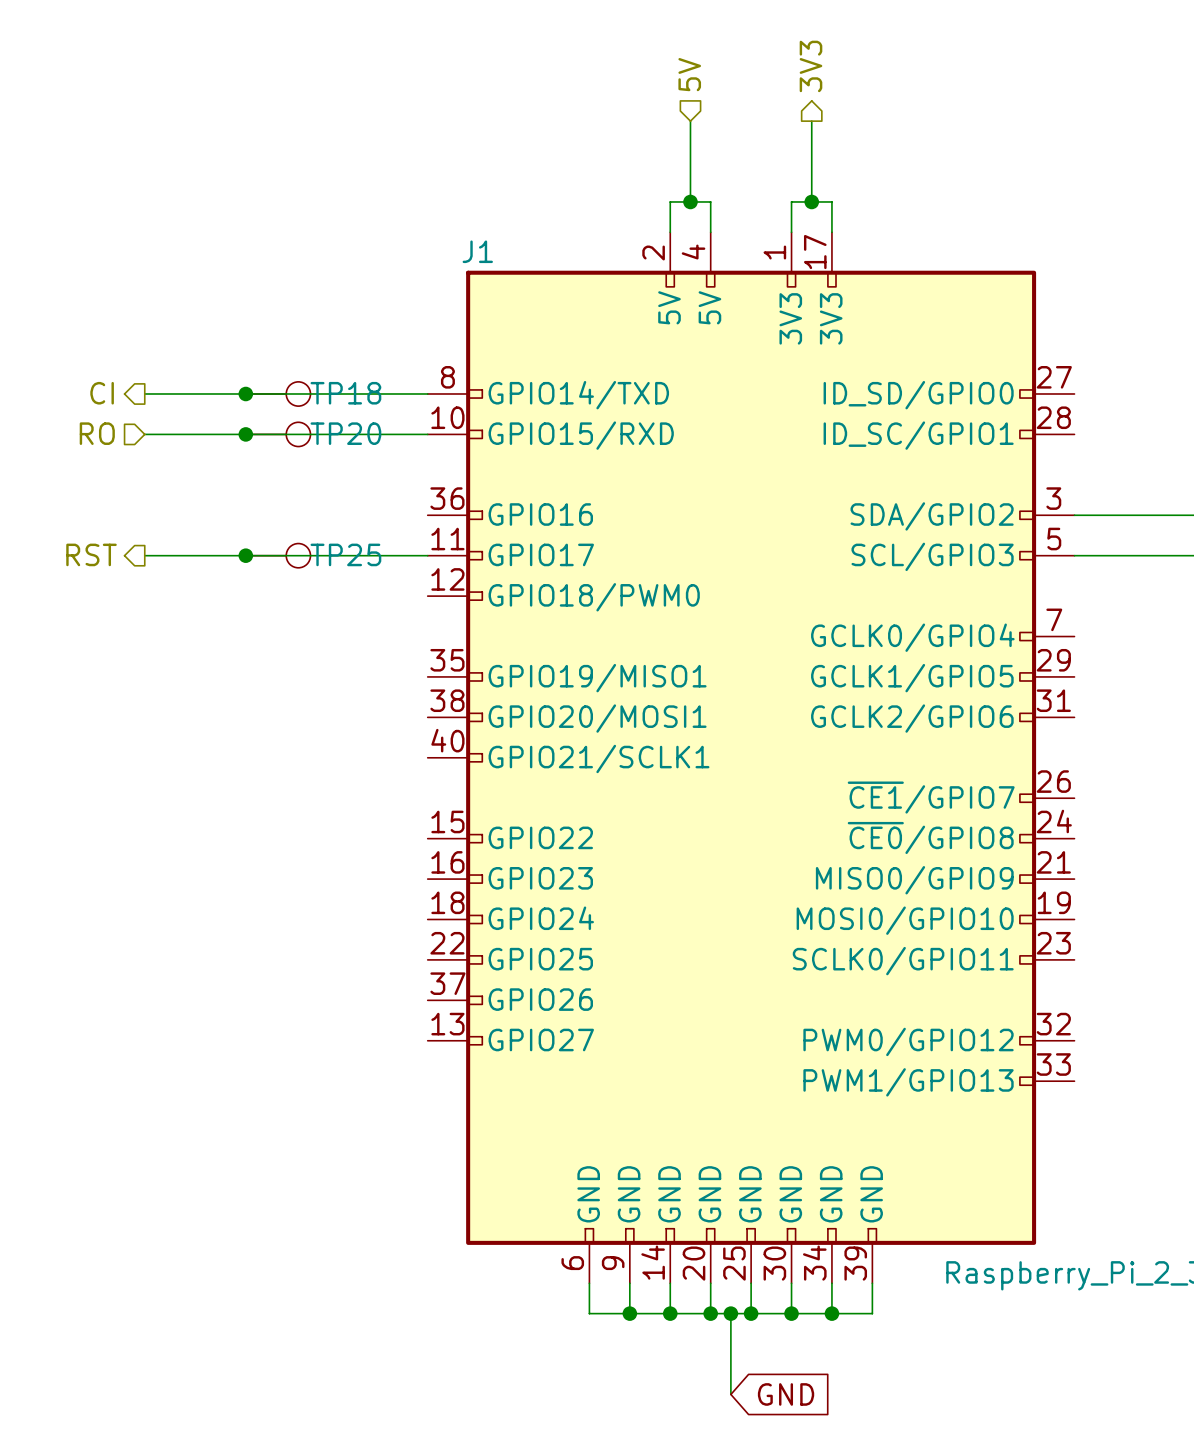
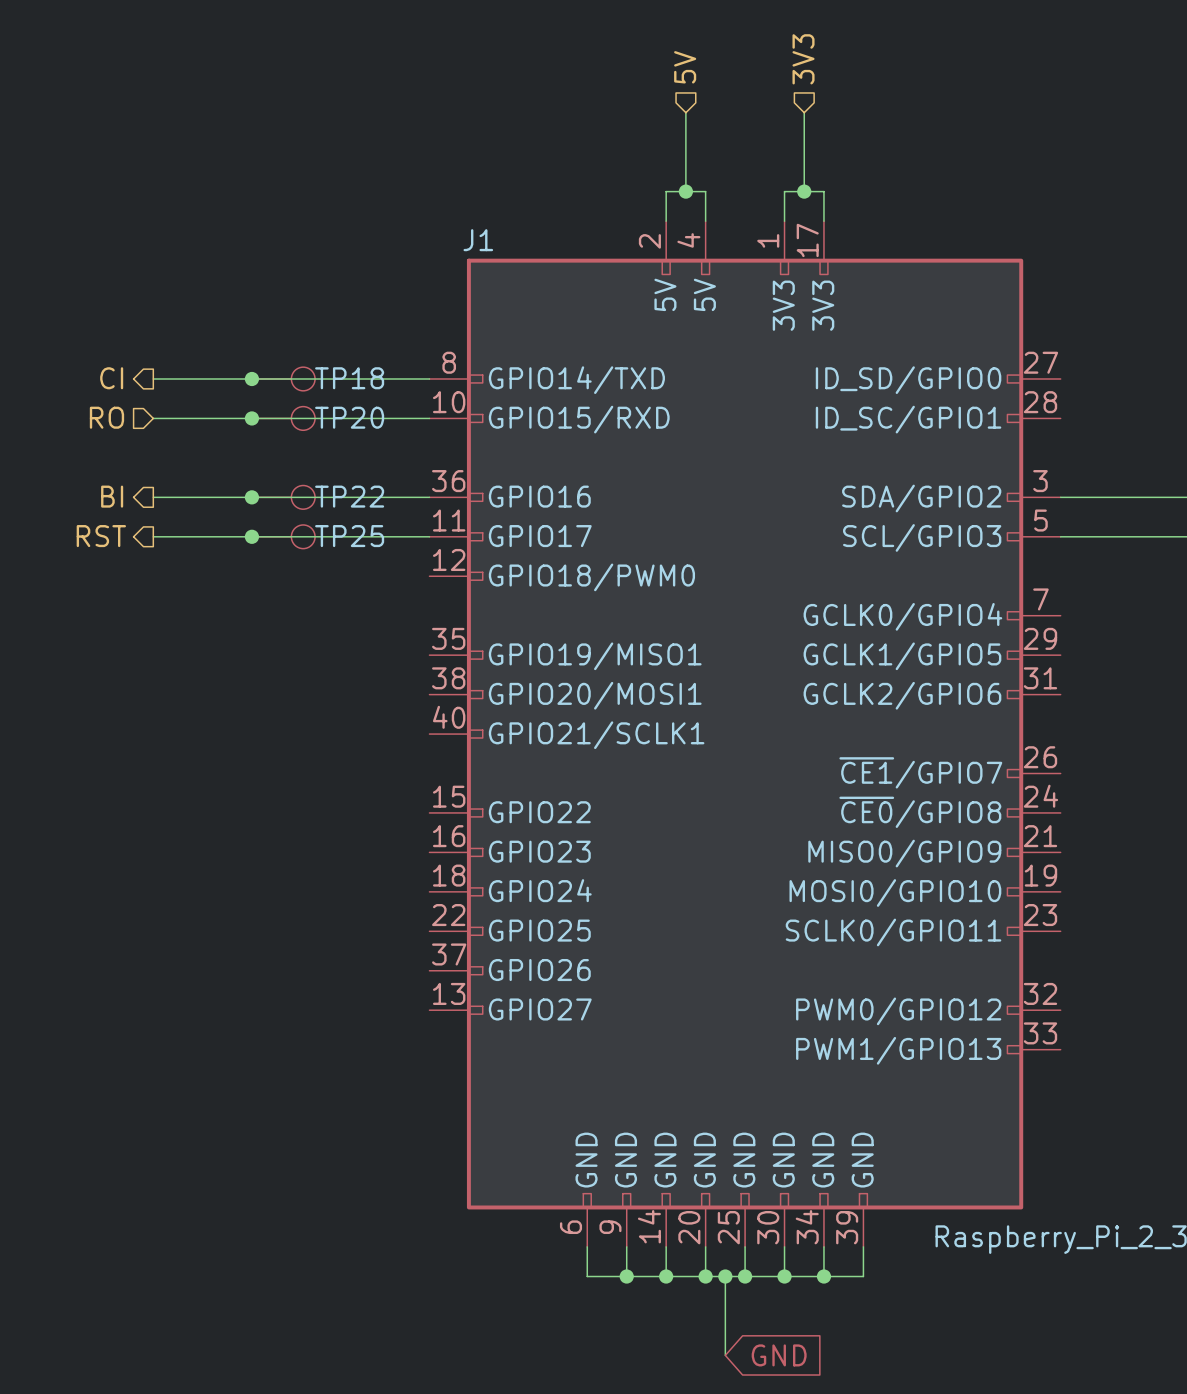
hierarchical label shape: output (810, 66) -> input (803, 59)
hierarchical label: none -> BI (112, 496)
wire: none -> (153, 497) (429, 497)
junction: none -> (251, 497)
TP22: none -> (283, 497)

